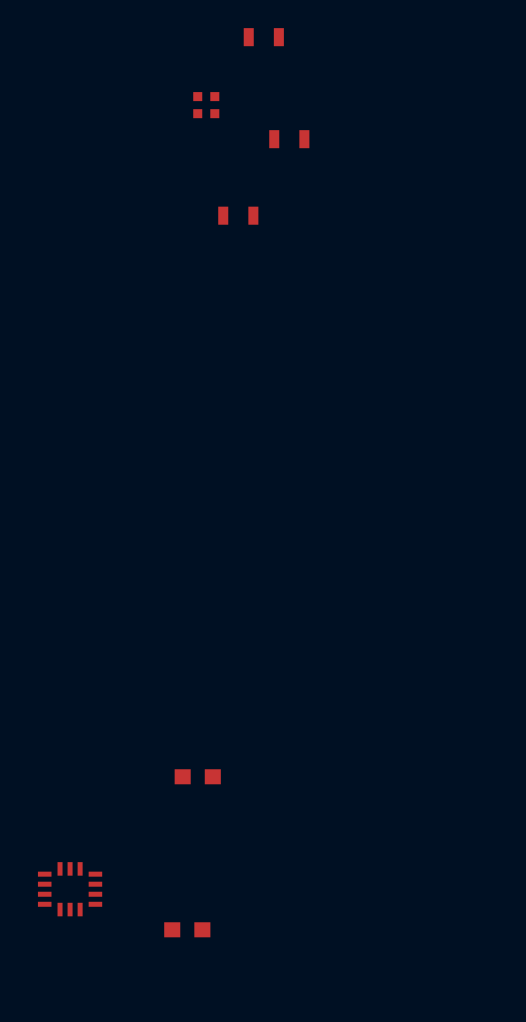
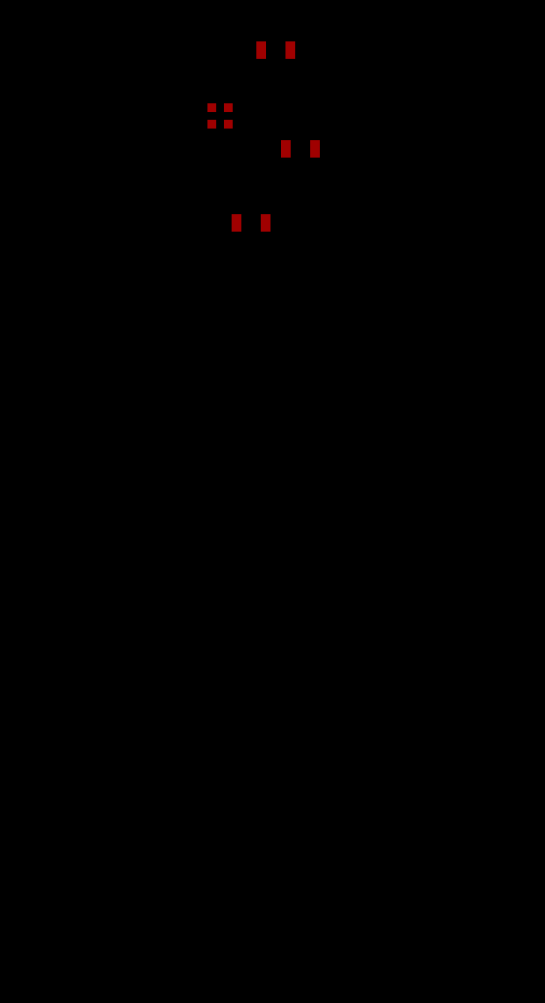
part: (197, 776) -> none
part: (70, 889) -> none
part: (187, 929) -> none

